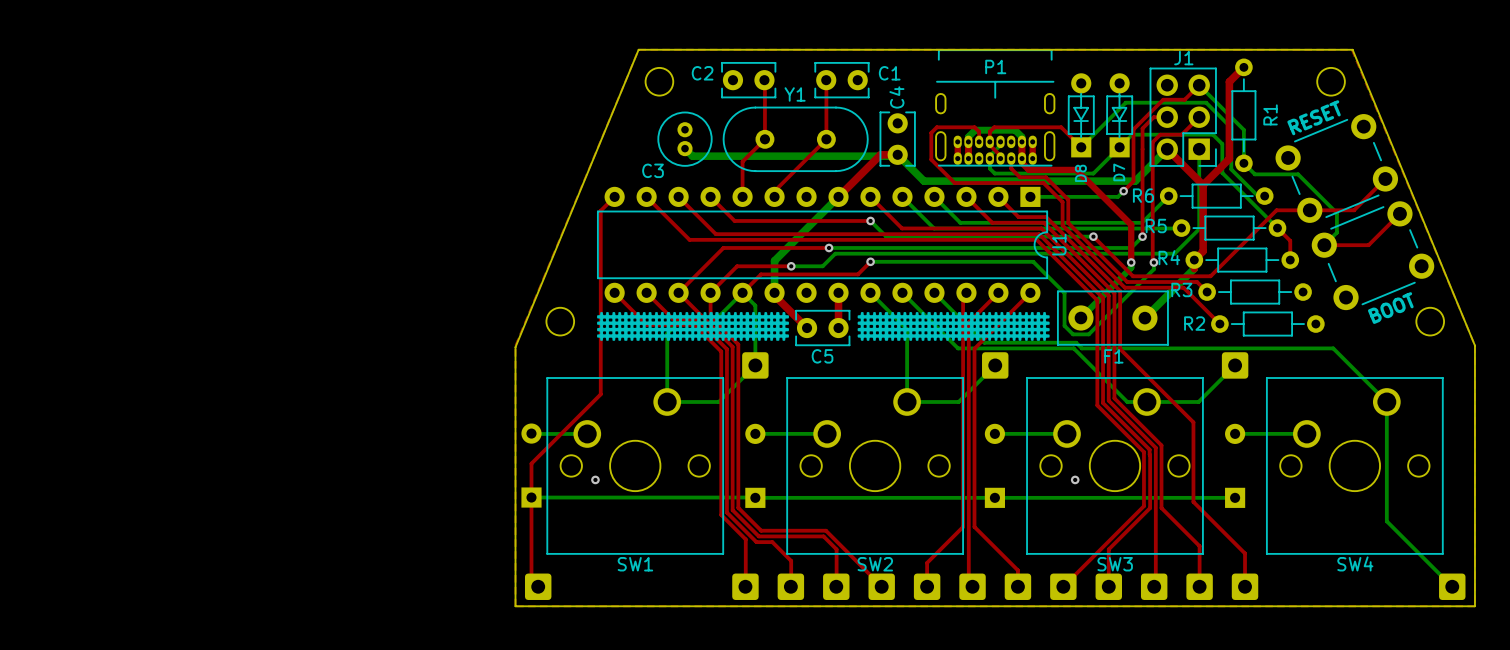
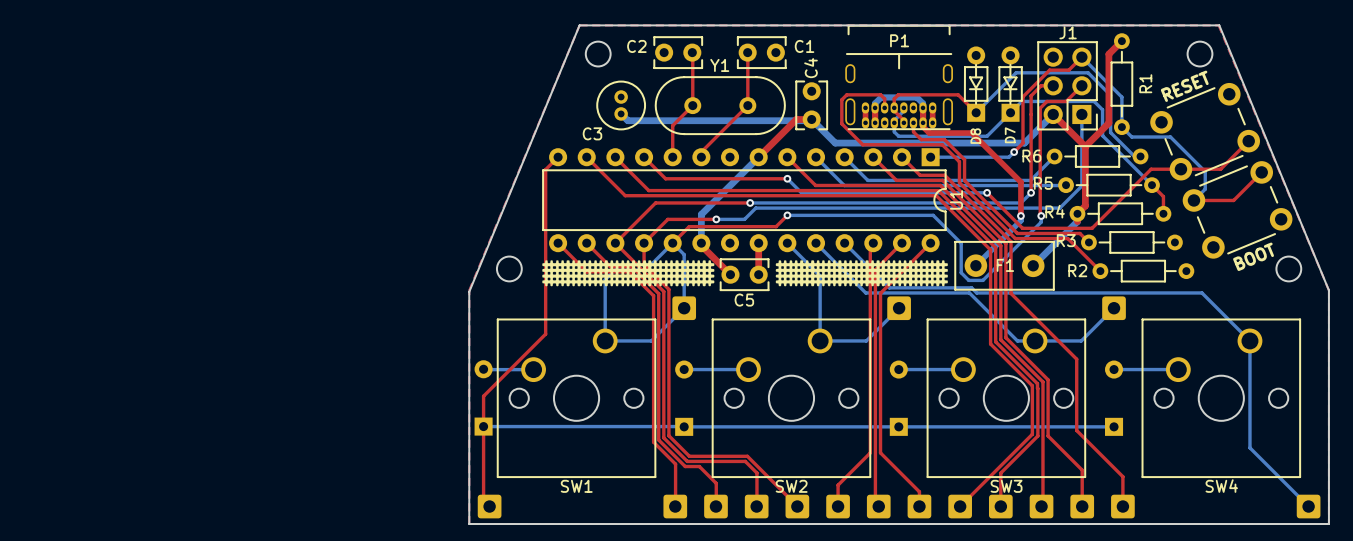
F1 name position: F1 (1113, 356) -> F1 (1005, 265)
via: (595, 479) -> none
via: (1075, 479) -> none

